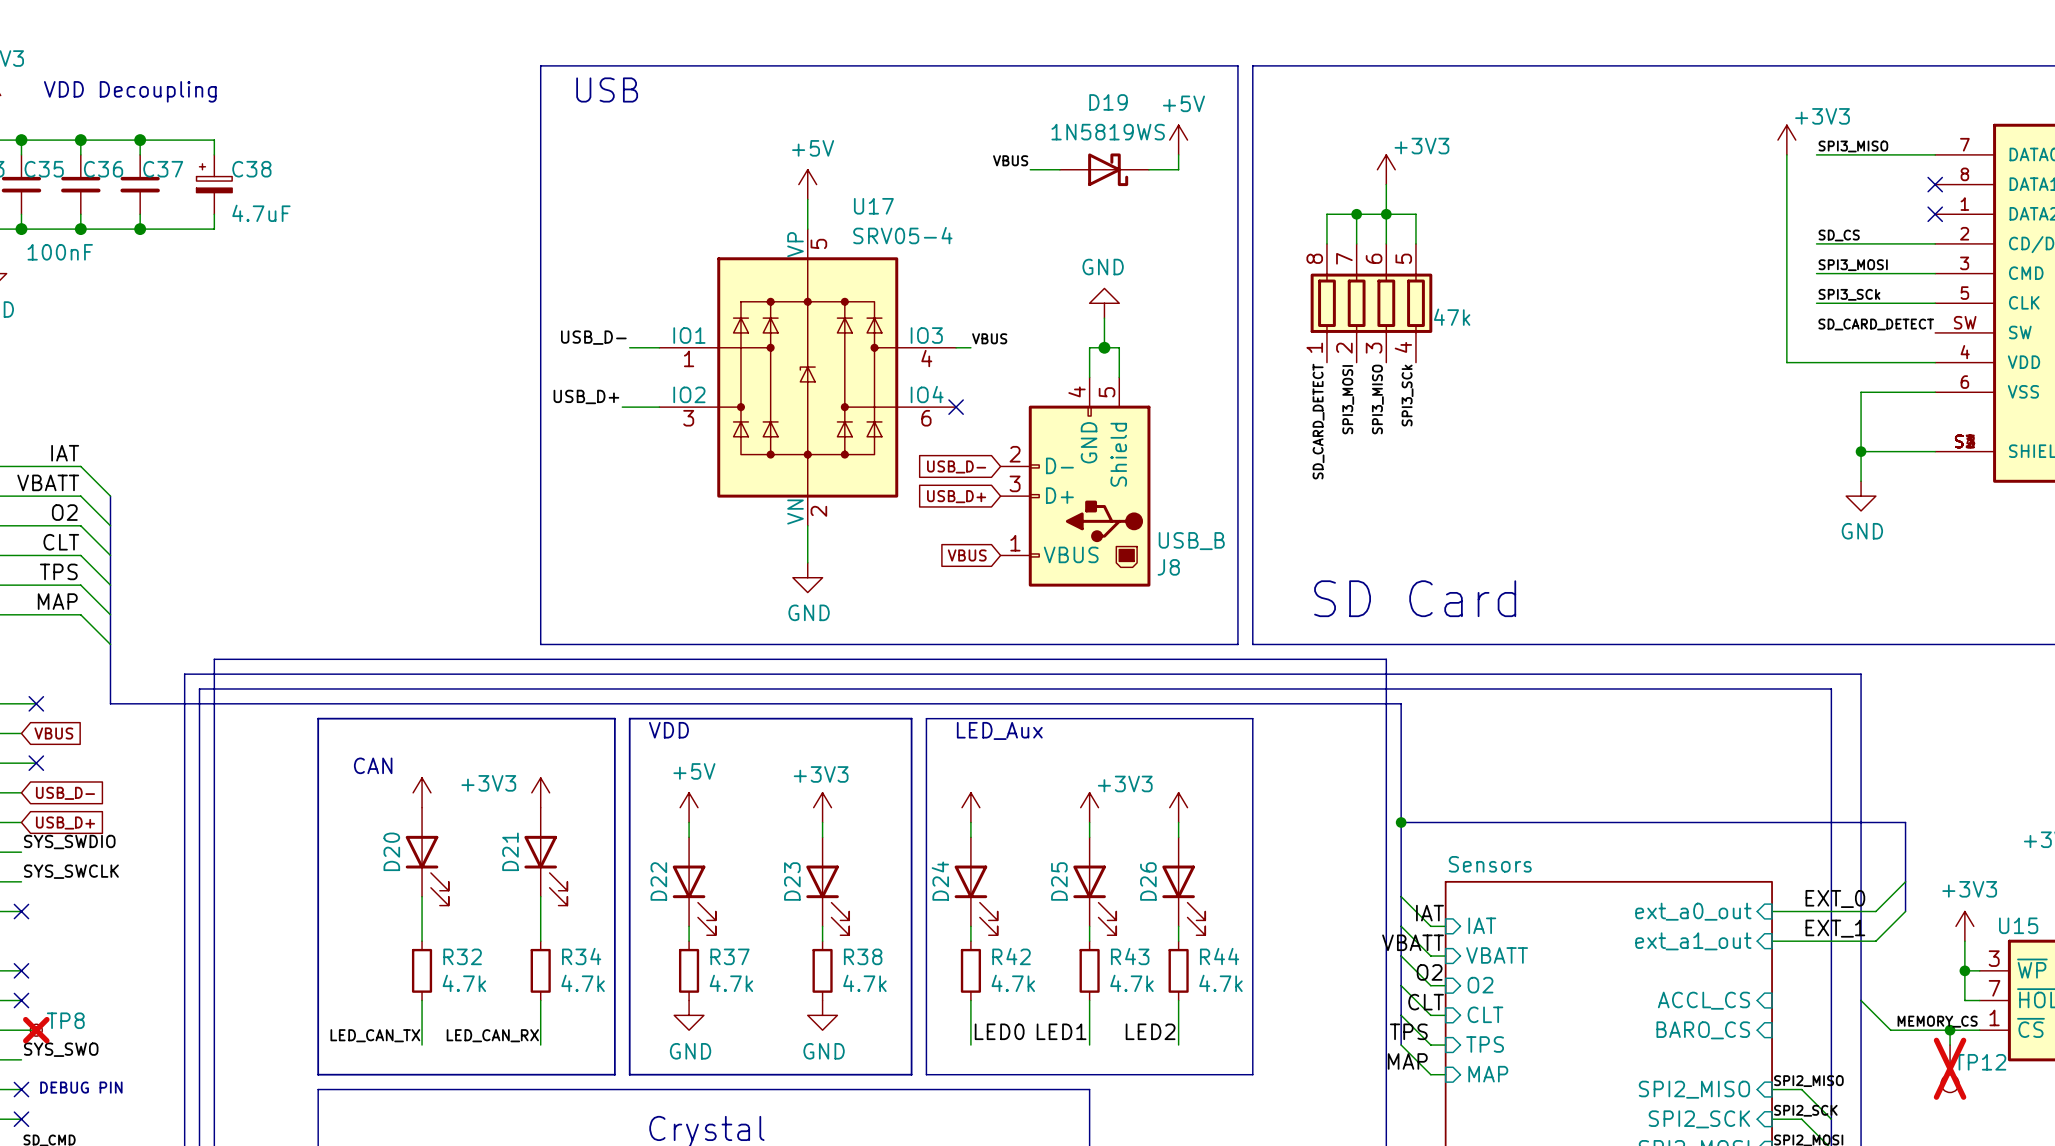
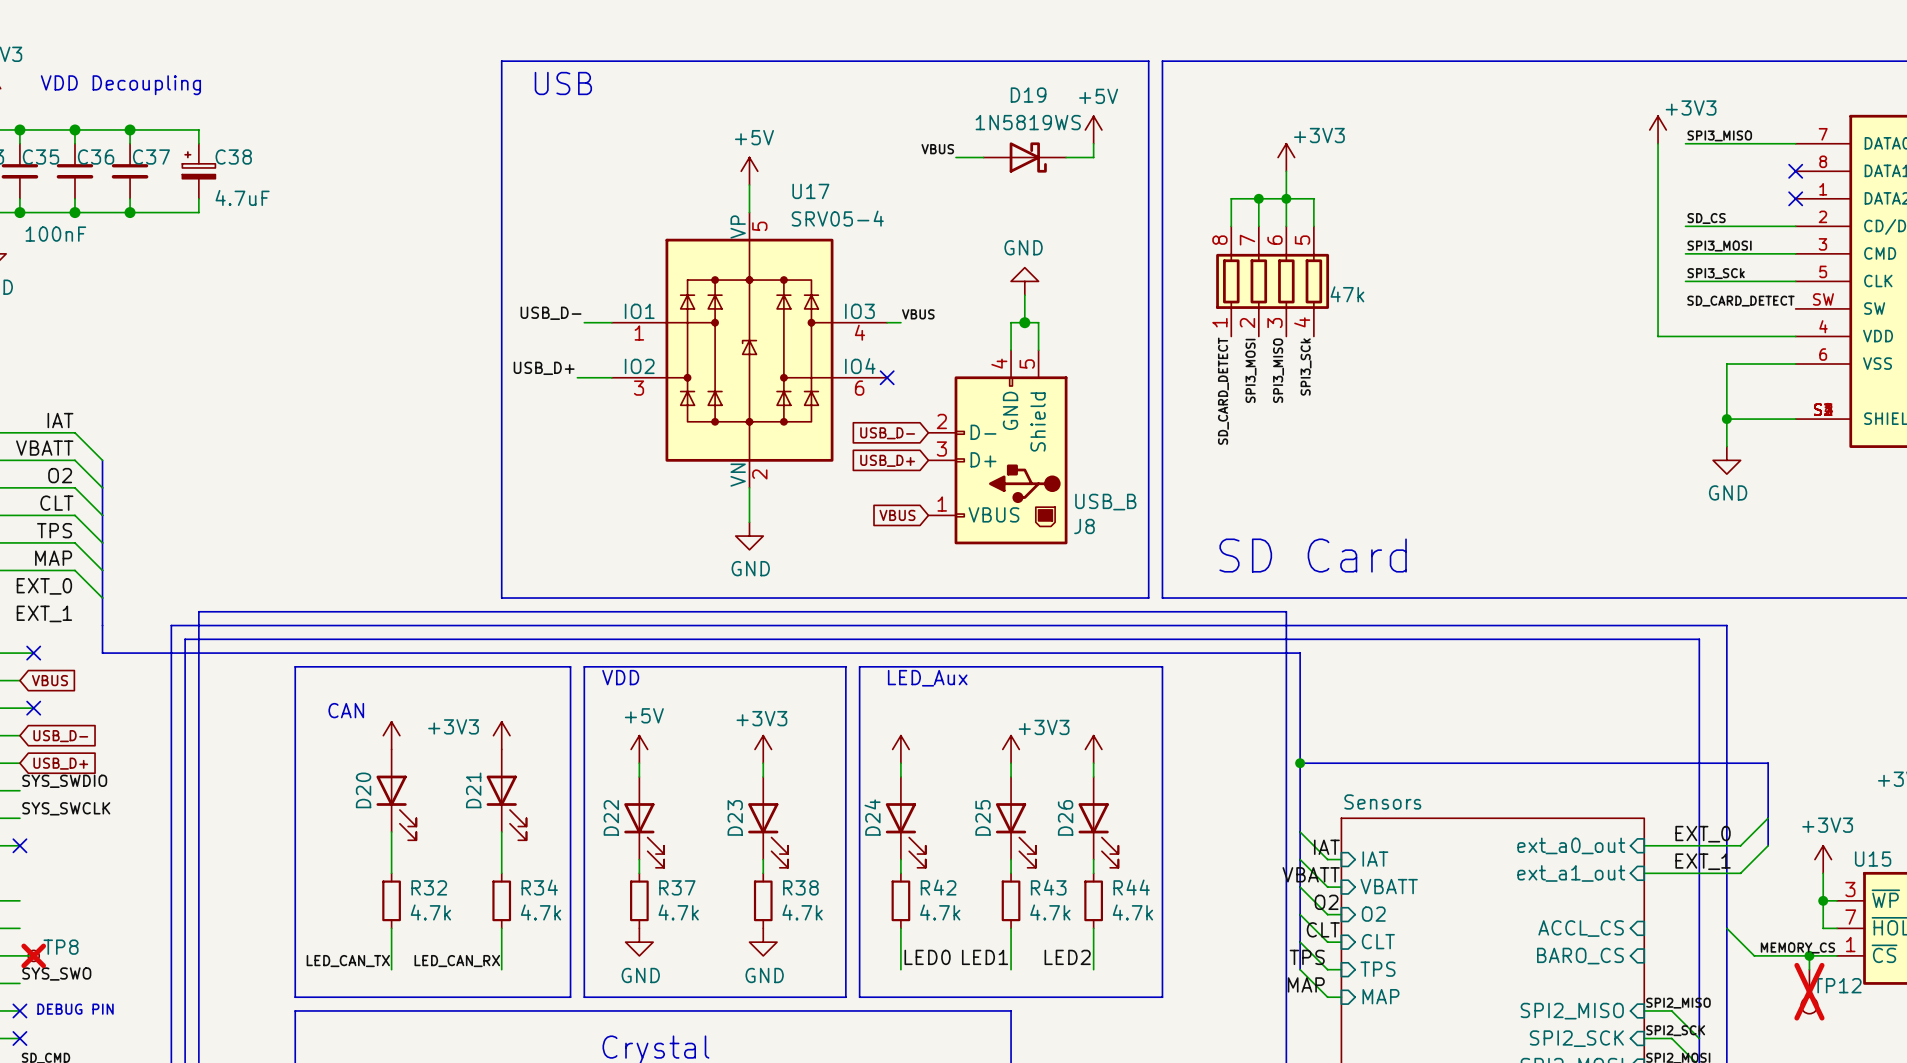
label: none -> EXT_0 (44, 586)
label: none -> EXT_1 (44, 613)
no-connect mark: (21, 970) -> none
no-connect mark: (21, 1000) -> none

